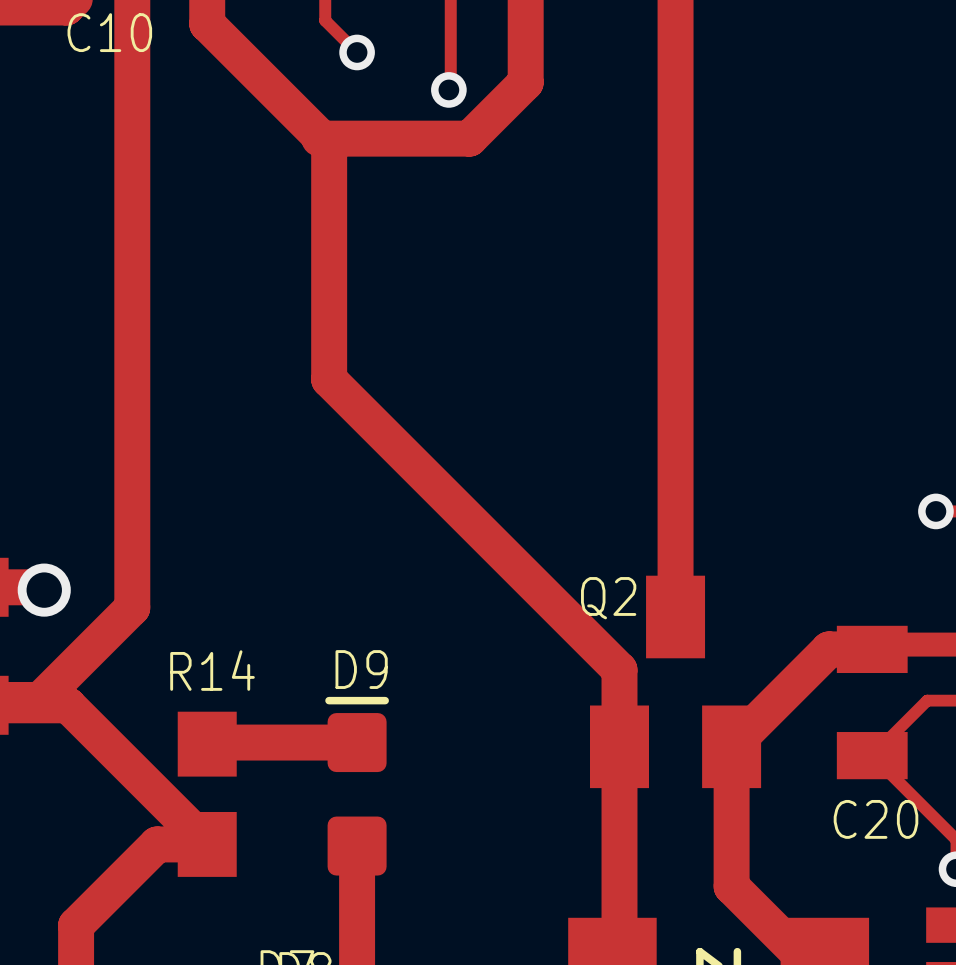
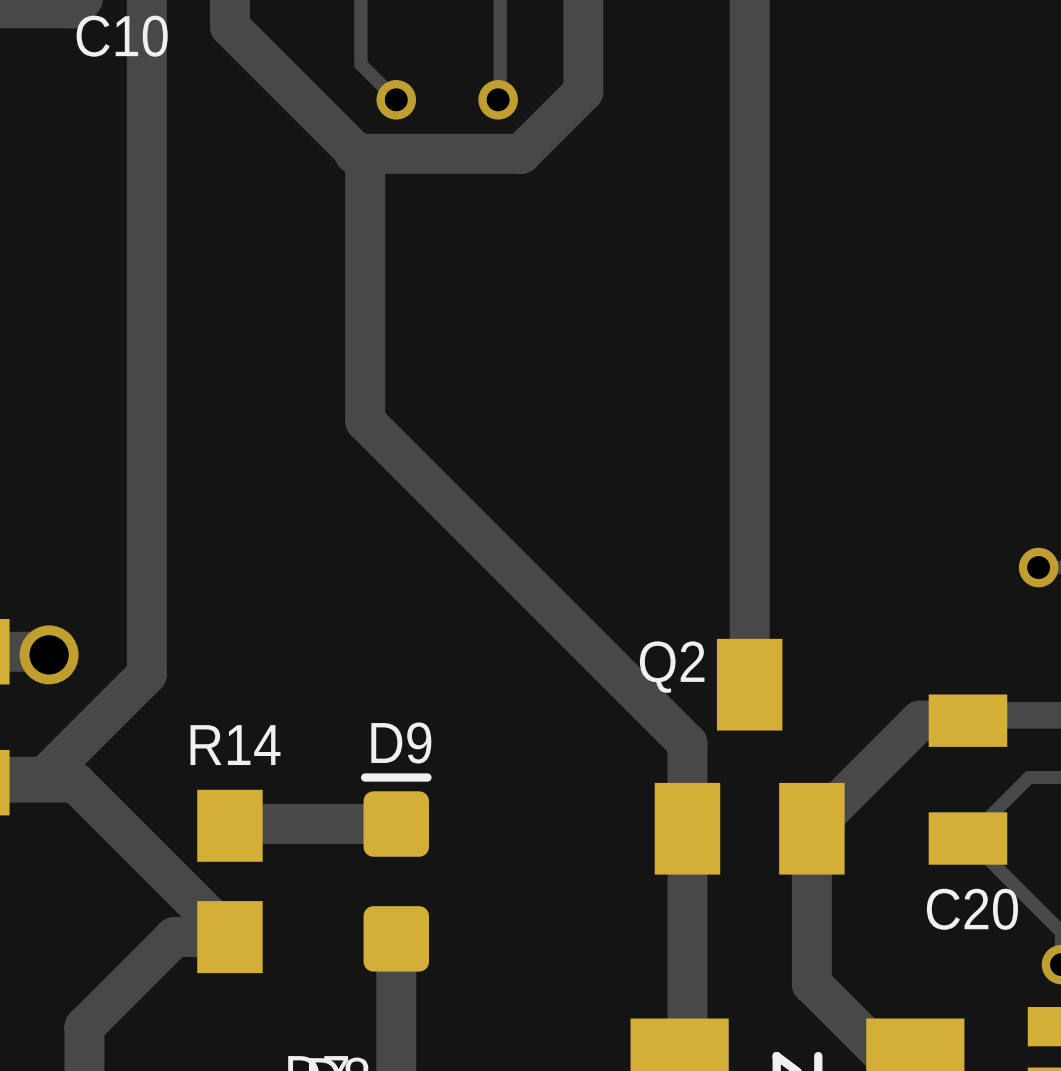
track: (325, 20) (357, 52) -> (360, 22) (360, 64) (396, 99)
via position: (357, 52) -> (396, 99)

